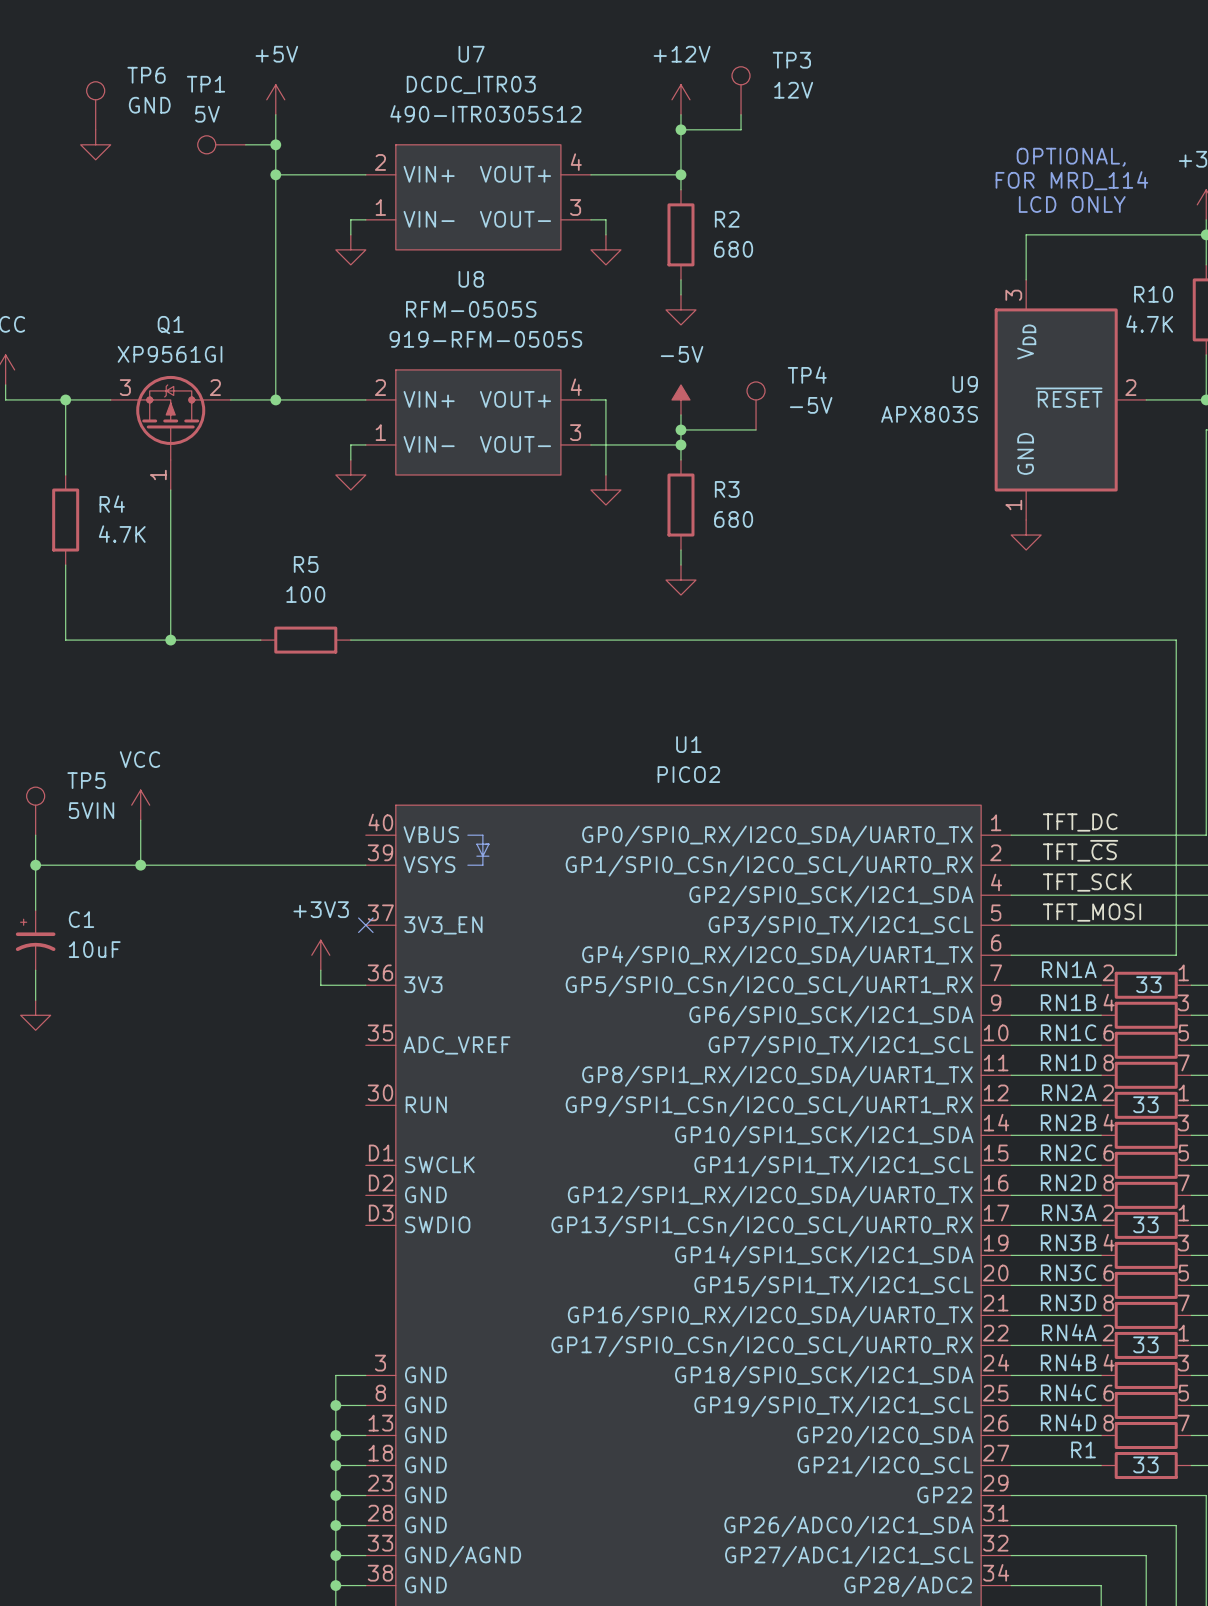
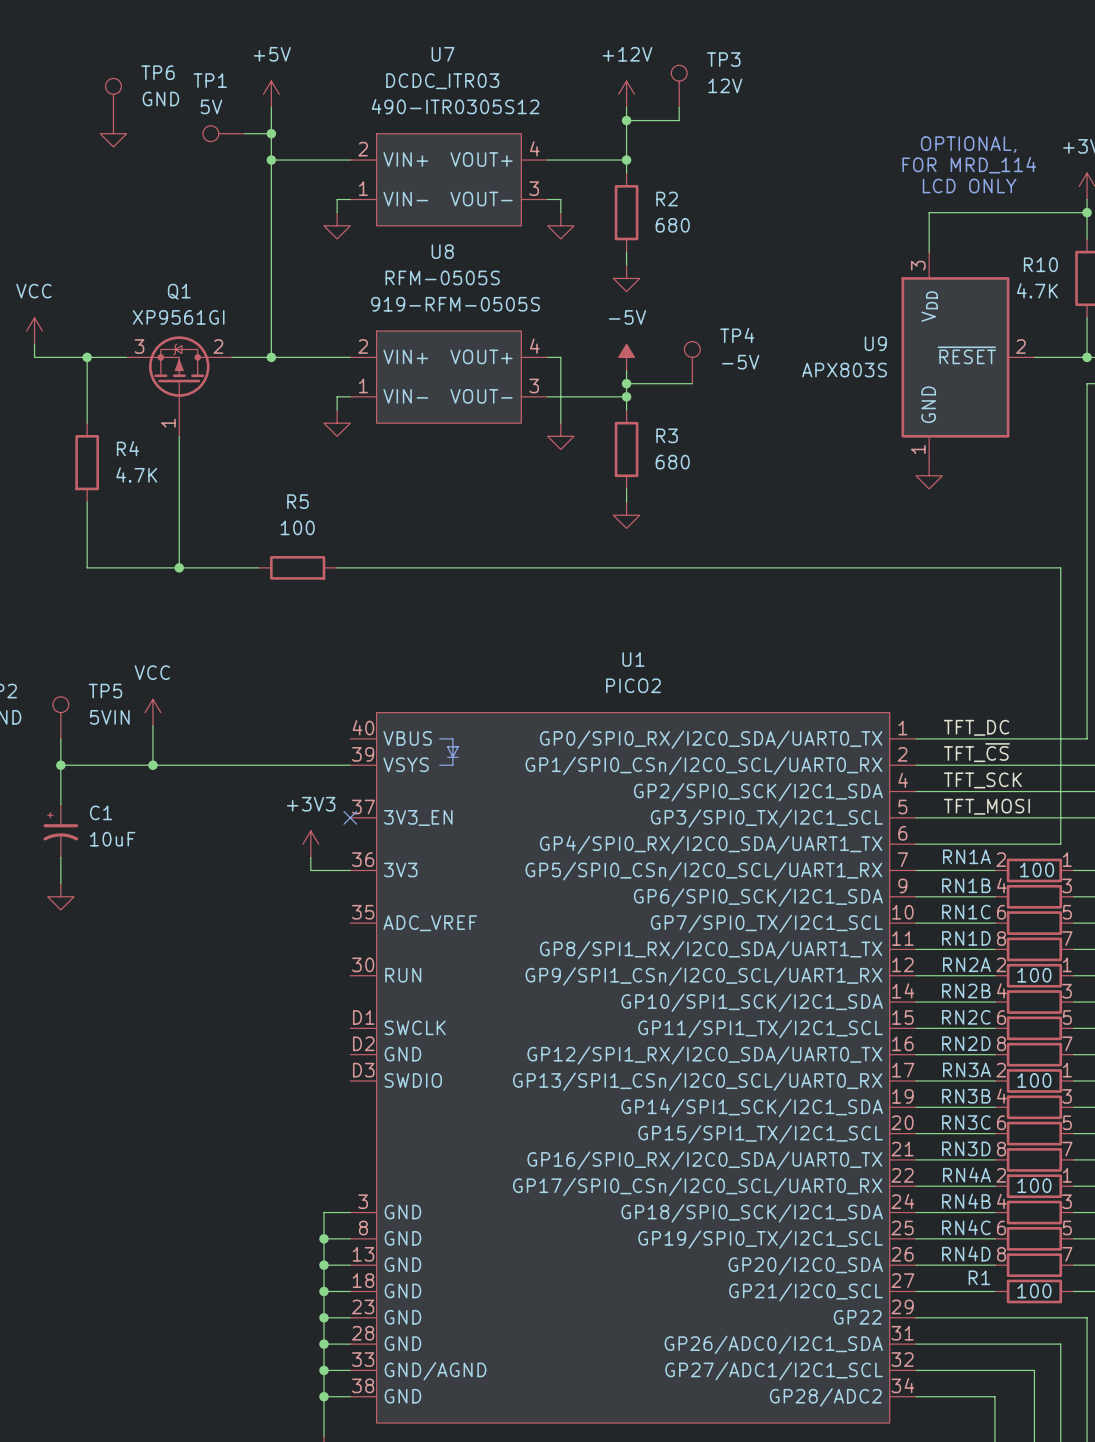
RN1A value: 33 (1148, 984) -> 100 (1037, 869)
RN2A value: 33 (1145, 1104) -> 100 (1034, 975)
RN3A value: 33 (1145, 1224) -> 100 (1034, 1080)
RN4A value: 33 (1145, 1344) -> 100 (1034, 1185)
R1 value: 33 (1145, 1464) -> 100 (1034, 1290)

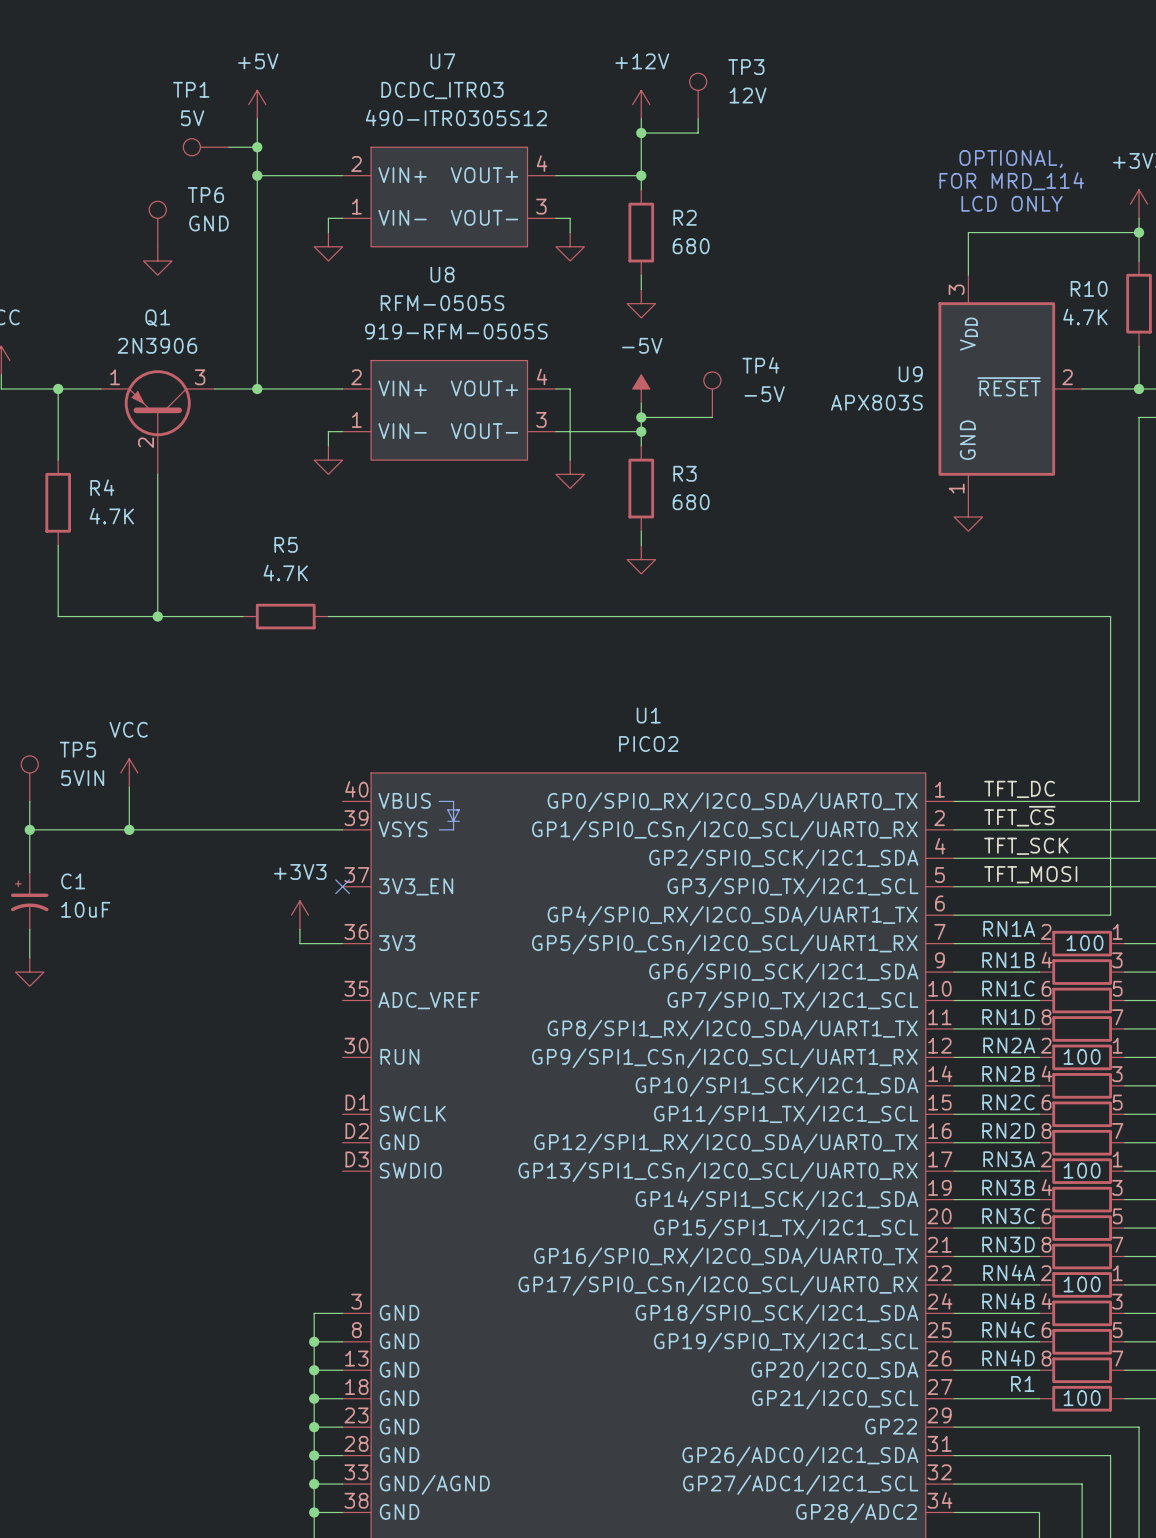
TP6 position: (113, 99) -> (157, 224)
power symbol position: (113, 133) -> (157, 261)
Q1 value: XP9561GI (178, 317) -> 2N3906 (157, 345)
Q1 symbol: [126, 336, 232, 437] -> [100, 370, 215, 475]
R5 value: 100 (297, 527) -> 4.7K (285, 573)

